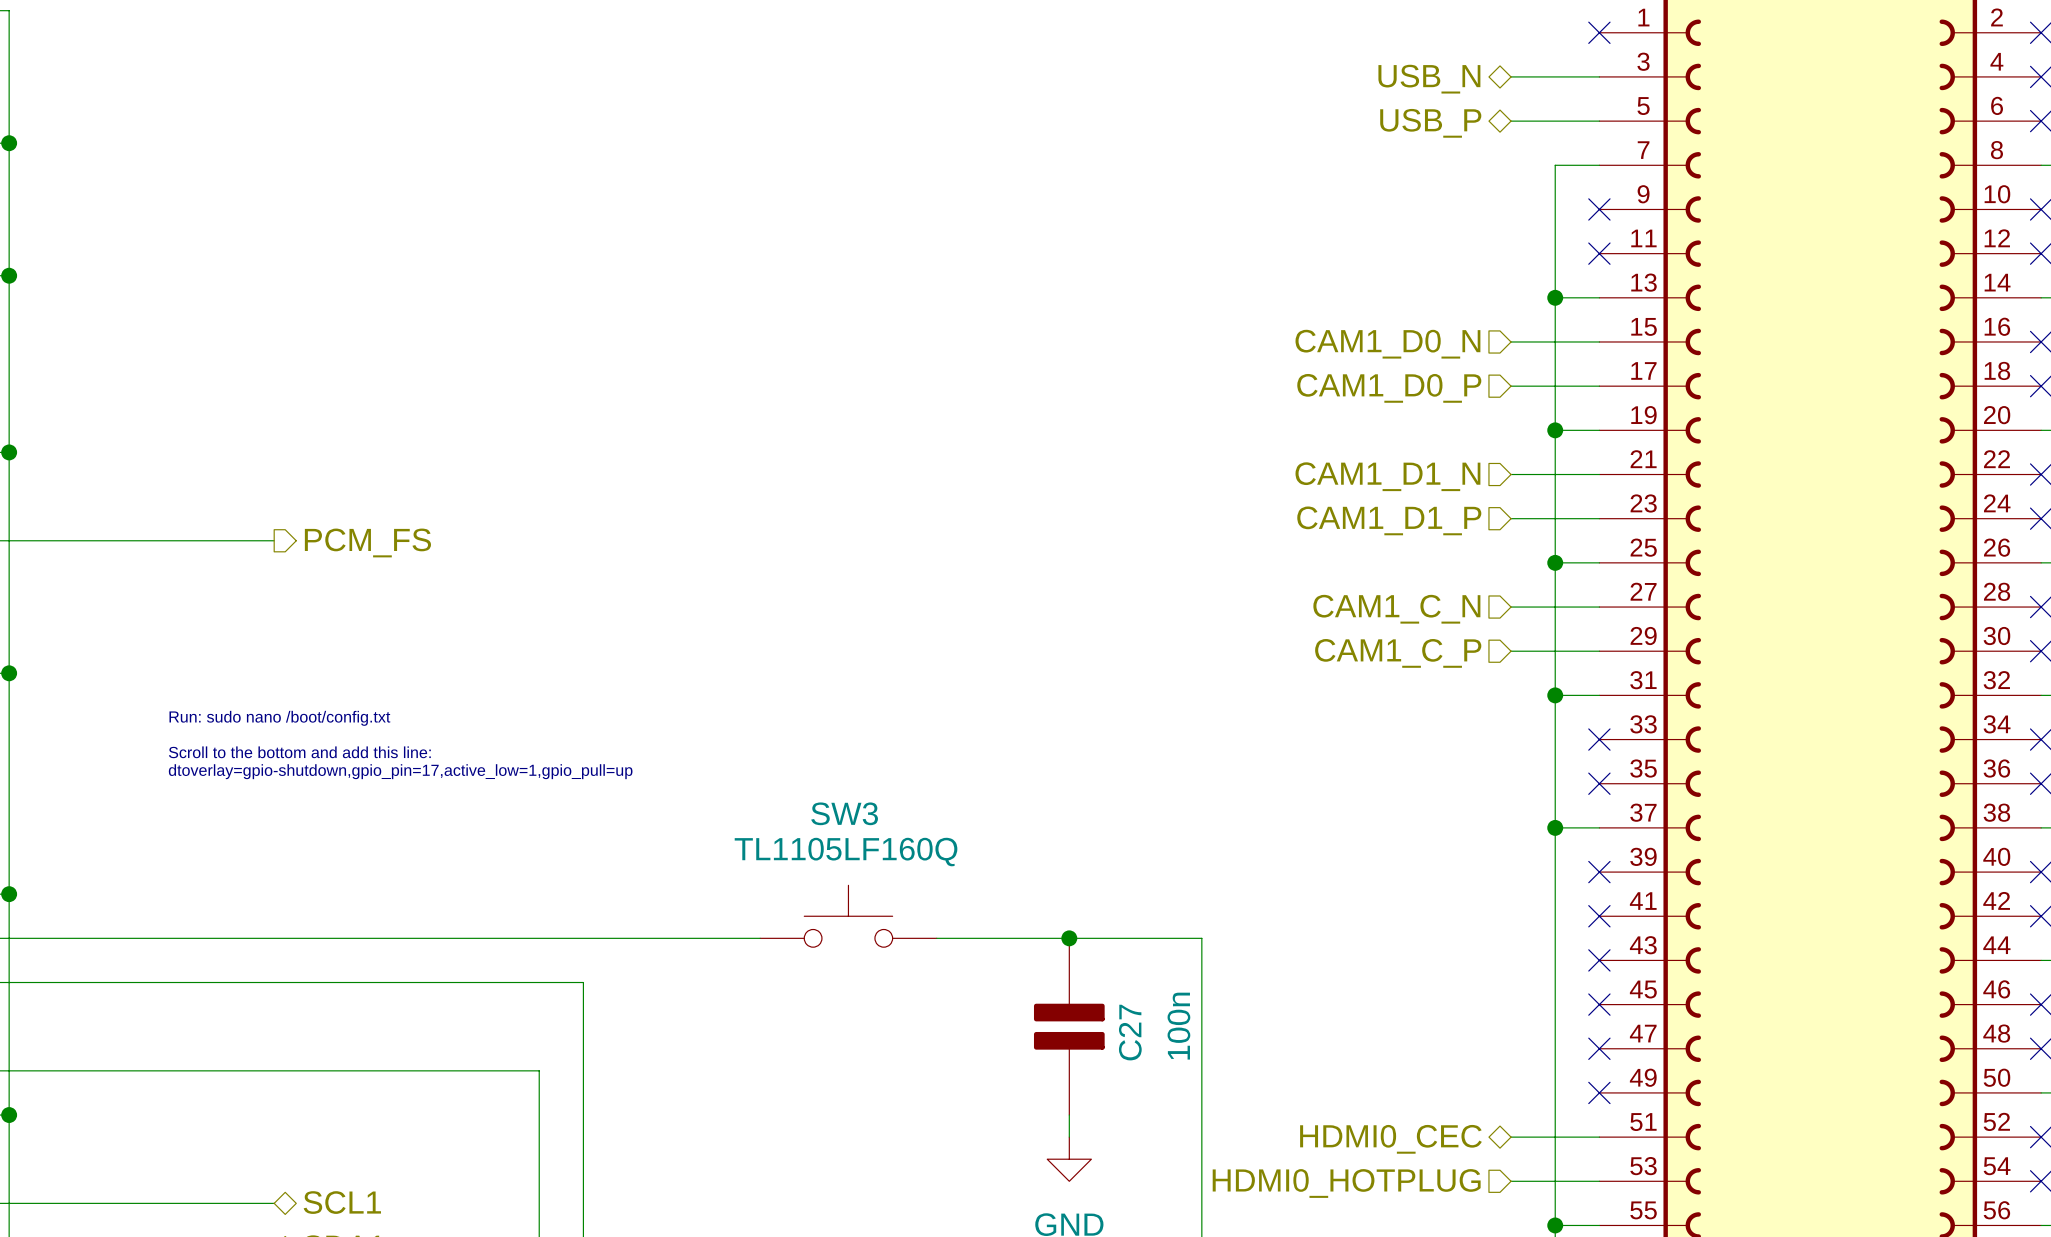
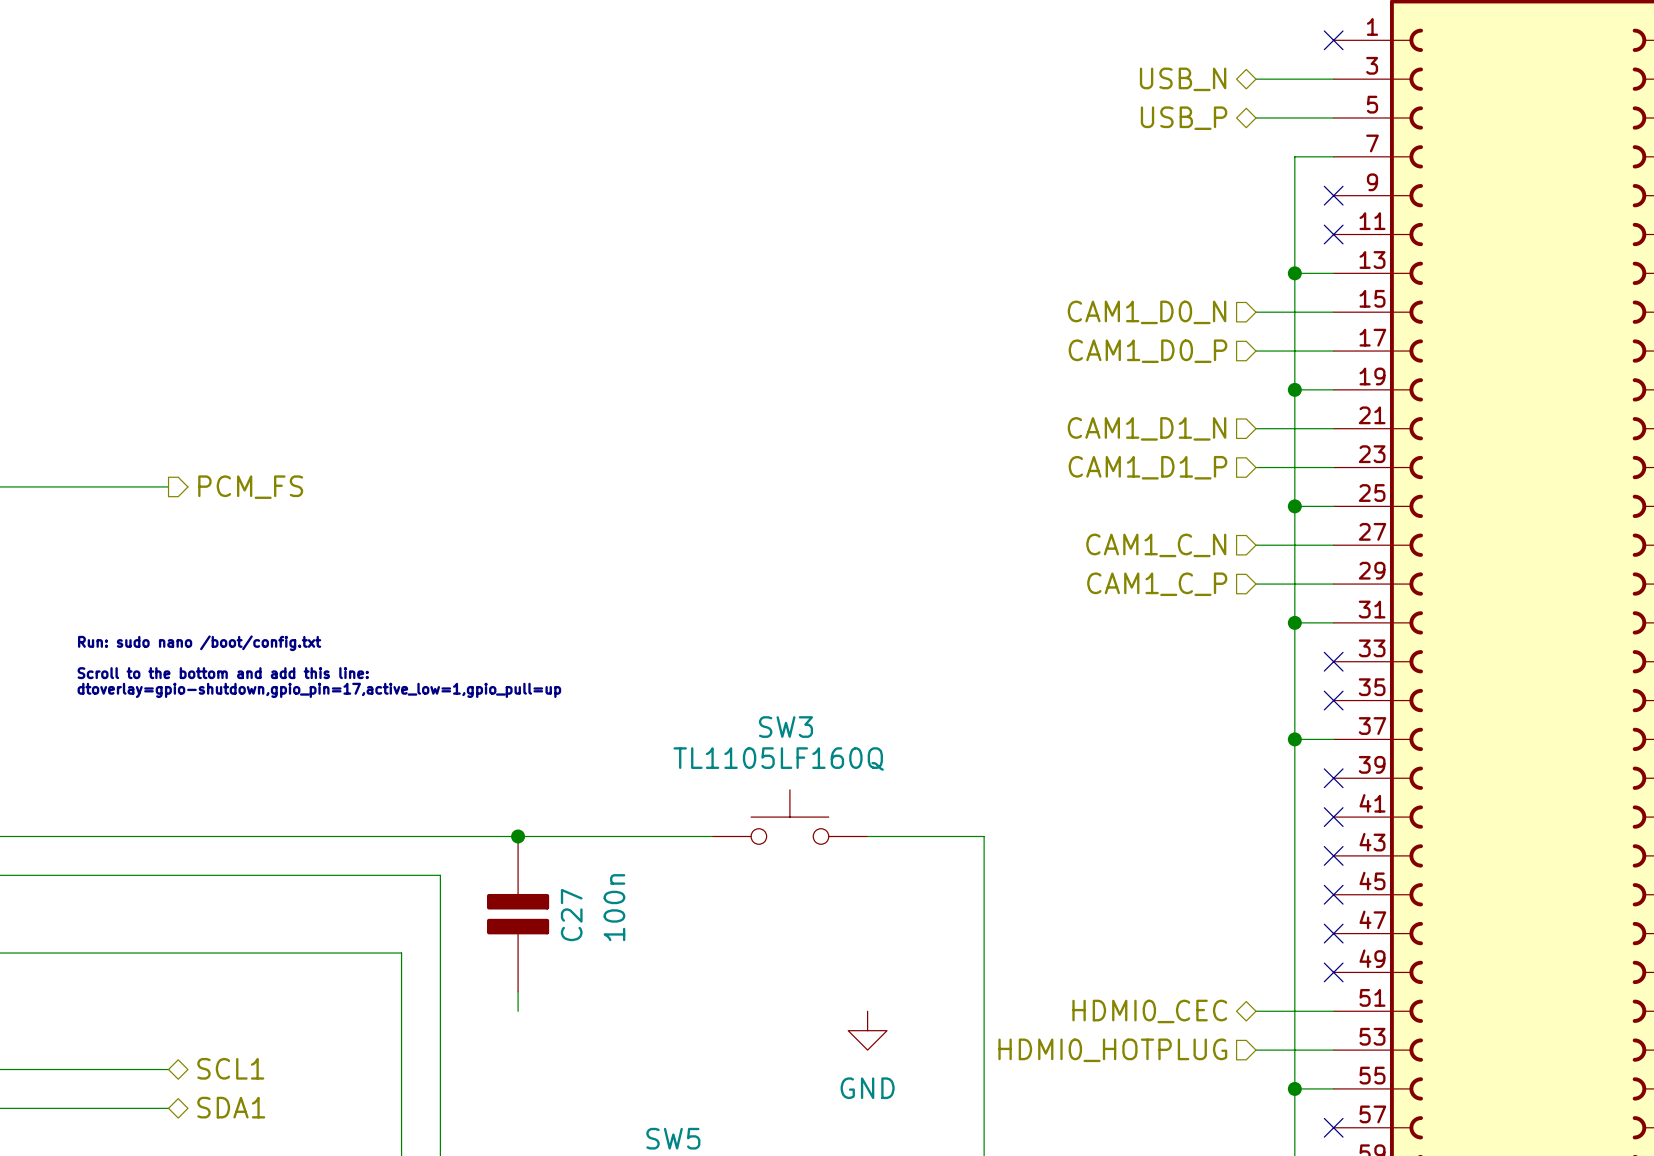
SW3 position: (848, 916) -> (789, 817)
junction: none -> (518, 836)
wire: (936, 938) (1069, 938) -> (595, 836) (712, 836)
junction: (1069, 938) -> none
C27 position: (1069, 1026) -> (518, 914)
wire: (1069, 1115) (1069, 1137) -> (518, 991) (518, 1011)

